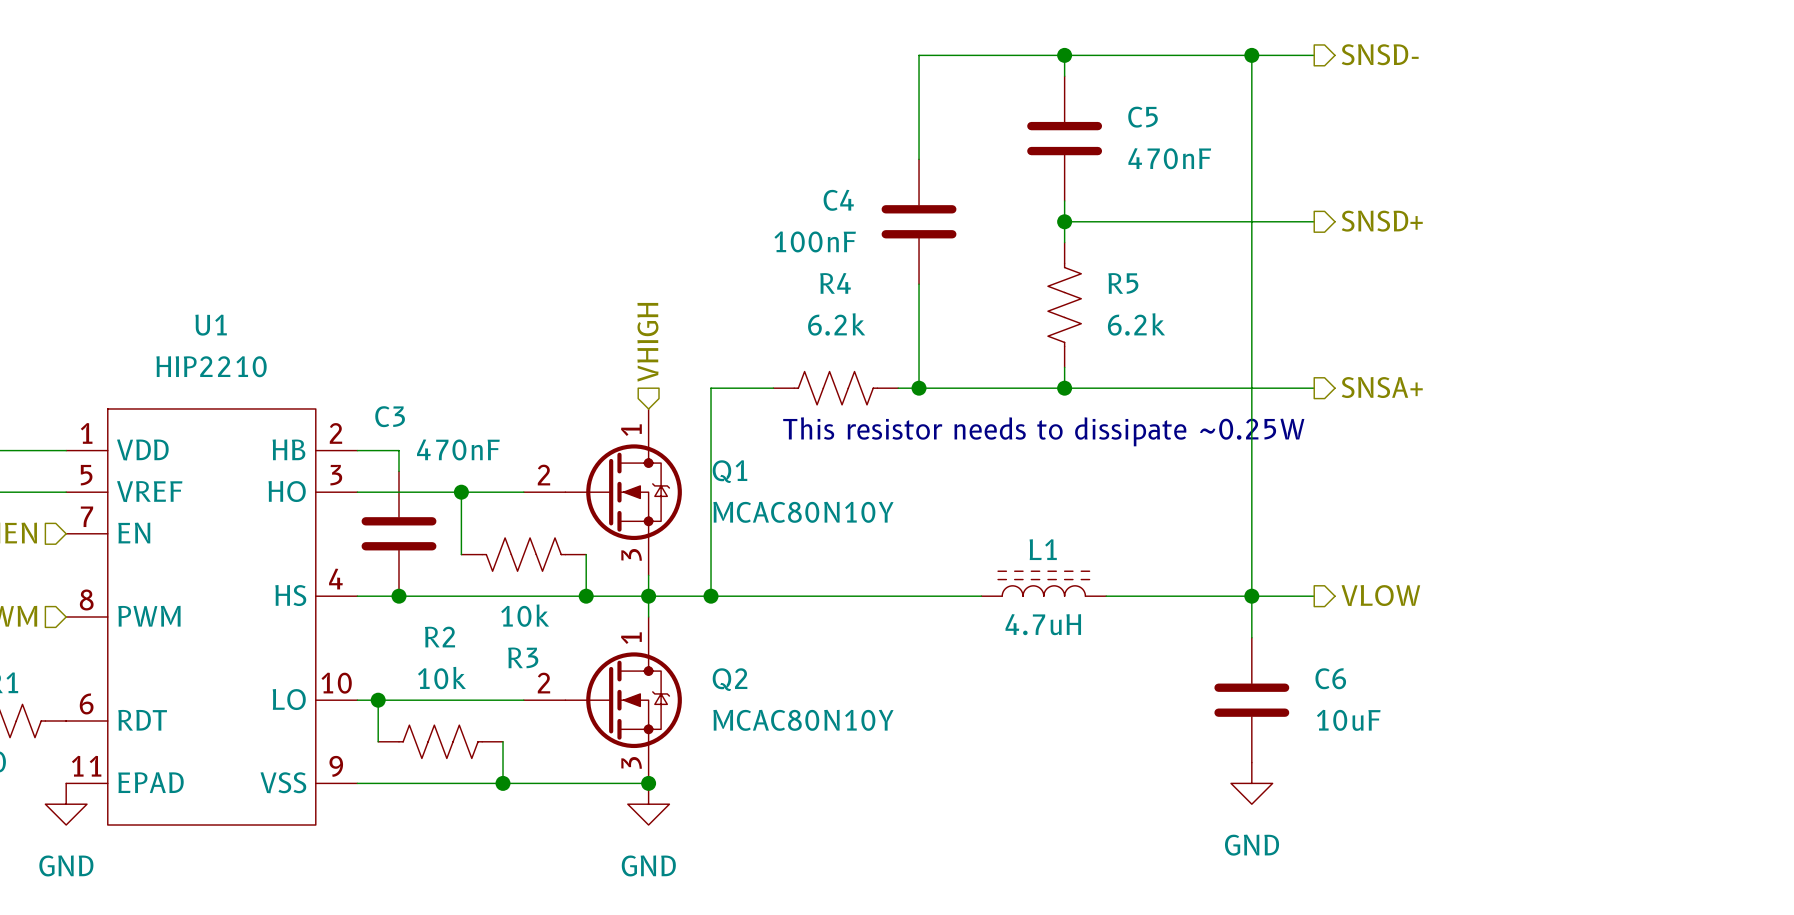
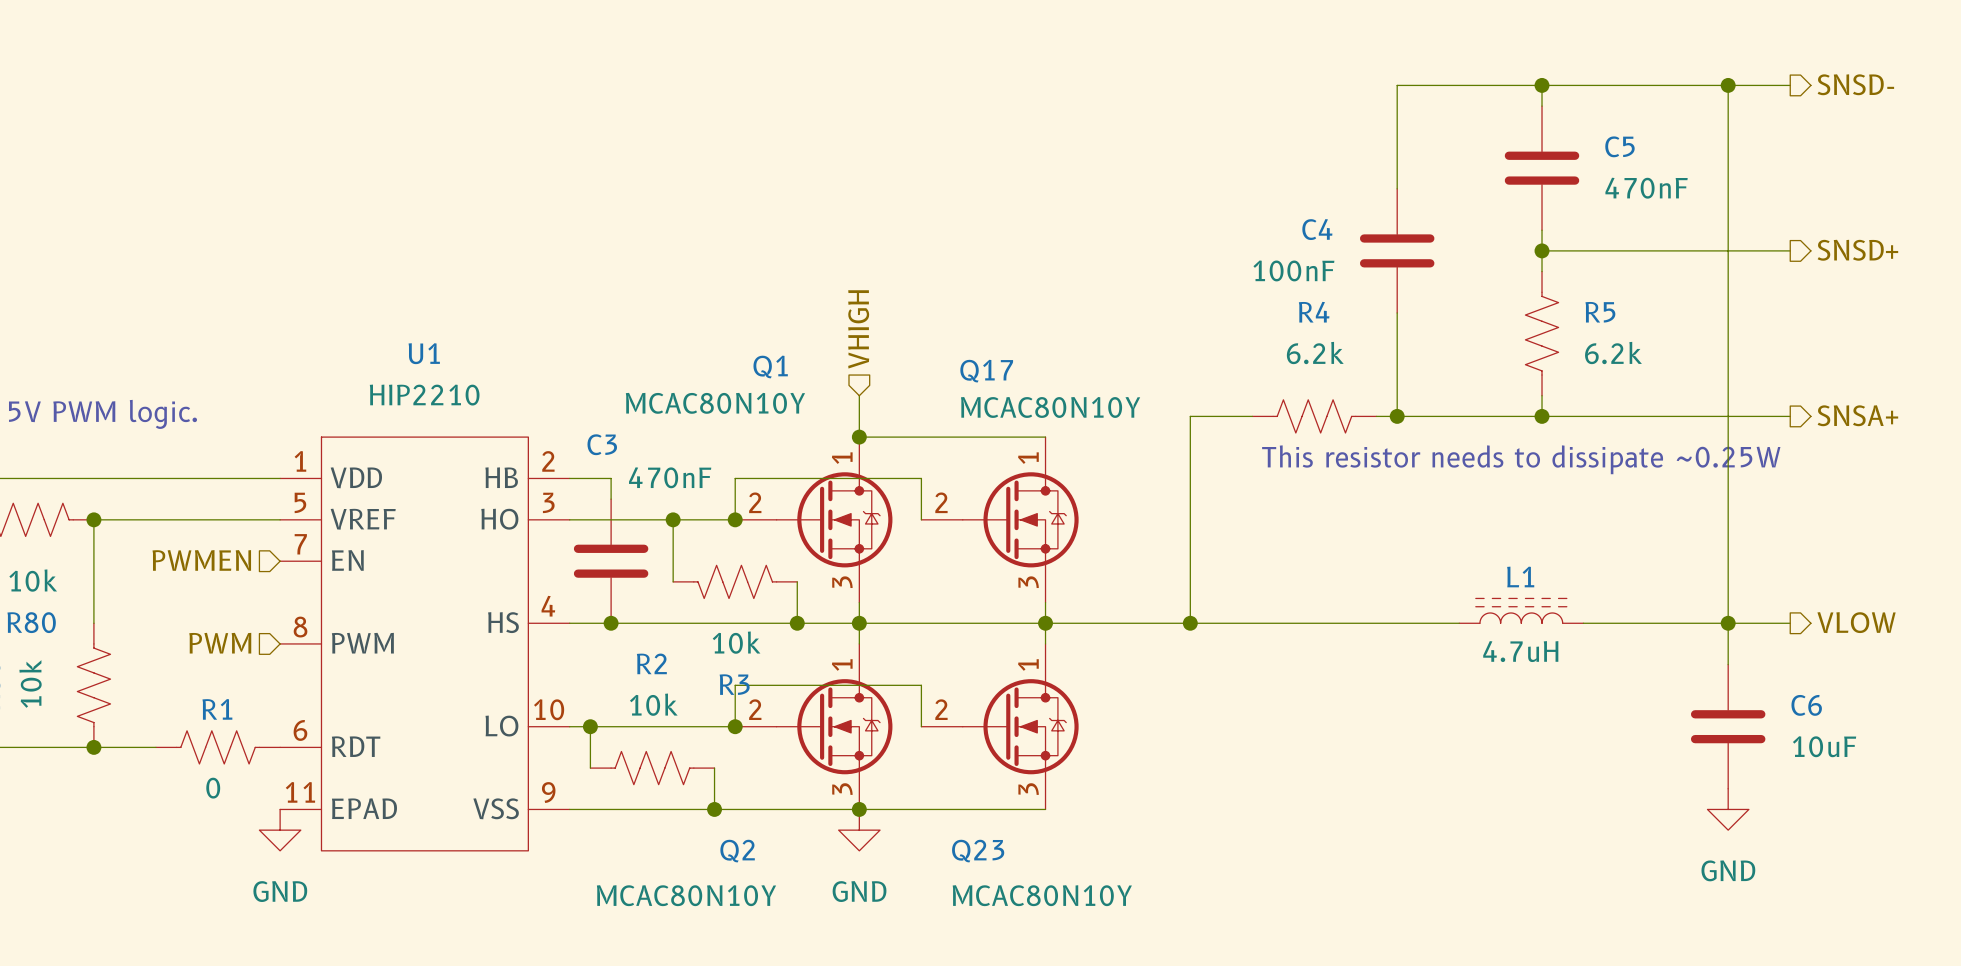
hierarchical label position: SNSD- (1380, 54) -> SNSD- (1855, 84)
wire: (1064, 55) (1064, 76) -> (1542, 85) (1542, 106)
junction: (1064, 55) -> none
wire: (1189, 55) (919, 55) (919, 159) -> (1397, 85) (1397, 188)
wire: (1251, 55) (1251, 637) -> (1728, 85) (1728, 664)
junction position: (1251, 55) -> (1542, 85)
wire: none -> (1521, 85) (1790, 85)
junction: none -> (1728, 85)
C5 position: (1064, 138) -> (1542, 168)
wire: (1064, 200) (1064, 242) -> (1542, 230) (1542, 271)
C4 position: (919, 221) -> (1397, 250)
wire: (1064, 221) (1314, 221) -> (1542, 250) (1790, 250)
junction: (1064, 221) -> none
junction: none -> (1542, 250)
hierarchical label position: SNSD+ (1382, 221) -> SNSD+ (1857, 250)
wire: (919, 284) (919, 388) -> (1397, 312) (1397, 416)
R5 position: (1064, 304) -> (1542, 333)
hierarchical label position: VHIGH (647, 342) -> VHIGH (858, 329)
wire: none -> (859, 395) (859, 437) (1045, 437)
wire: (1064, 367) (1064, 388) -> (1542, 395) (1542, 416)
hierarchical label position: SNSA+ (1382, 387) -> SNSA+ (1857, 415)
wire: (773, 388) (711, 388) (711, 450) -> (735, 519) (735, 478) (921, 478)
R4 position: (835, 388) -> (1314, 416)
wire: (898, 388) (981, 388) -> (1314, 623) (1190, 623) (1190, 416)
junction: (919, 388) -> none
wire: (1043, 388) (1168, 388) -> none
junction: (1064, 388) -> none
junction: none -> (1397, 416)
wire: none -> (1521, 416) (1790, 416)
junction: none -> (1542, 416)
junction: none -> (859, 437)
text position: This resistor needs to dissipate ~0.25W (1043, 431) -> This resistor needs to dissipate ~0.25W (1521, 459)
Q1 name position: Q1 (729, 471) -> Q1 (770, 366)
junction: none -> (735, 519)
wire: (711, 492) (711, 596) -> none
Q17: none -> MCAC80N10Y (1000, 519)
Q1 value position: MCAC80N10Y (803, 512) -> MCAC80N10Y (715, 403)
wire: none -> (1045, 602) (1045, 643)
L1 position: (1043, 583) -> (1521, 610)
hierarchical label position: VLOW (1380, 595) -> VLOW (1856, 622)
junction: (711, 596) -> none
junction: none -> (1045, 623)
junction: none -> (1190, 623)
wire: (1251, 596) (1314, 596) -> none
junction: (1251, 596) -> none
wire: none -> (1583, 623) (1790, 623)
junction: none -> (1728, 623)
Q2 name position: Q2 (730, 679) -> Q2 (737, 851)
wire: none -> (735, 726) (735, 685) (921, 685) (921, 726)
junction: none -> (735, 726)
Q23: none -> MCAC80N10Y (1000, 726)
C6 position: (1251, 700) -> (1728, 726)
Q2 value position: MCAC80N10Y (803, 720) -> MCAC80N10Y (686, 895)
wire: none -> (859, 809) (1045, 809)
power symbol position: GND (1251, 783) -> GND (1728, 809)

